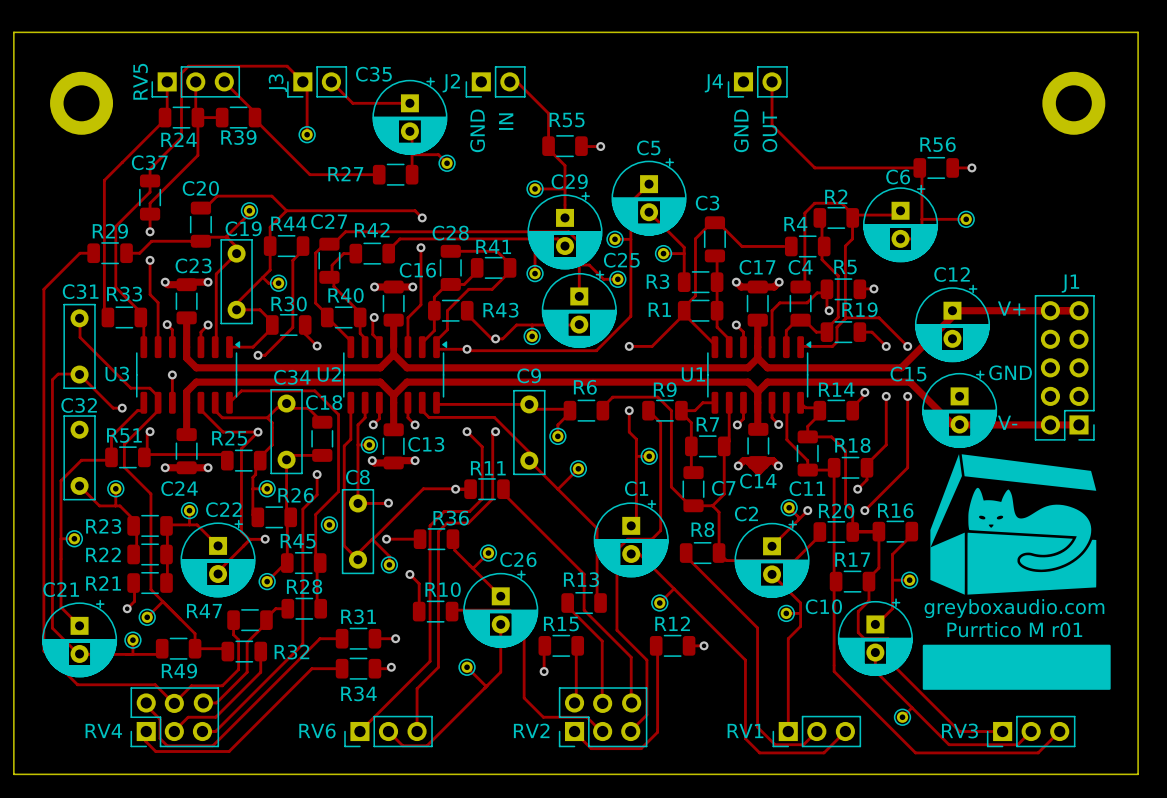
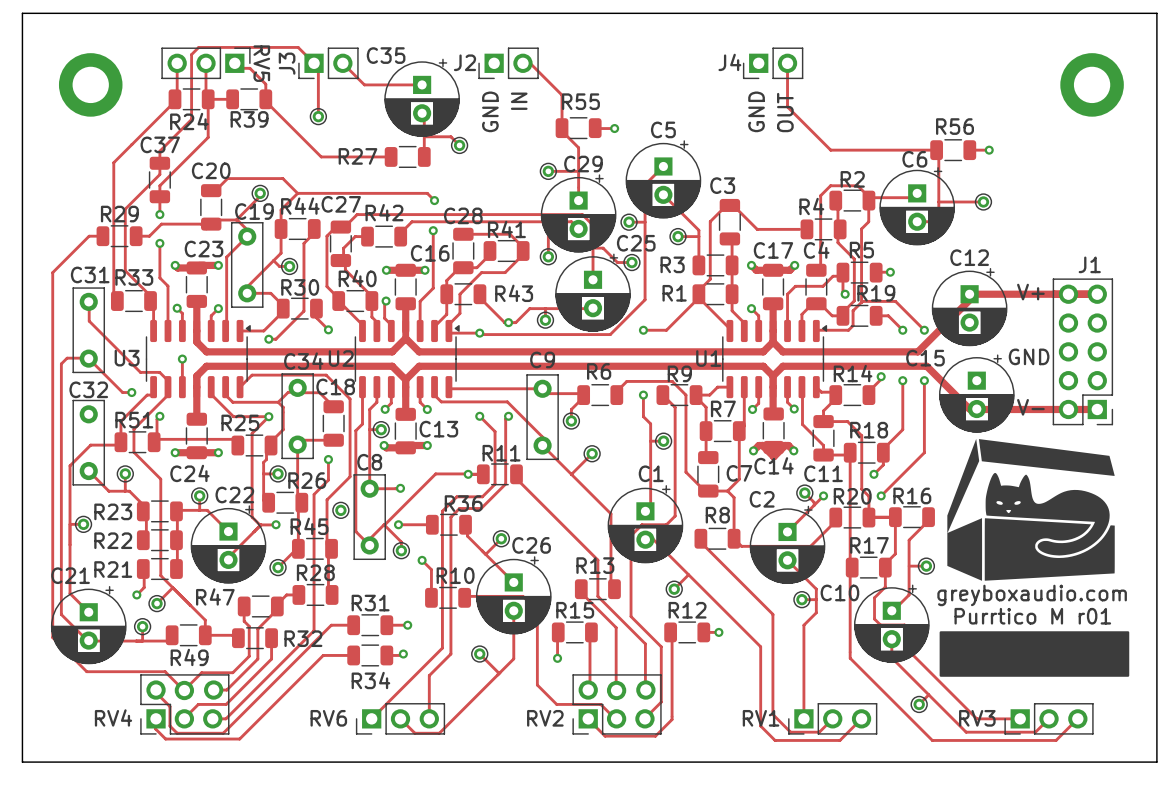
RV5 rotation: 0° (195, 81) -> 180° (205, 63)
track: (224, 81) (255, 112) -> none
track: none -> (234, 68) (249, 68) (265, 84) (265, 99)

